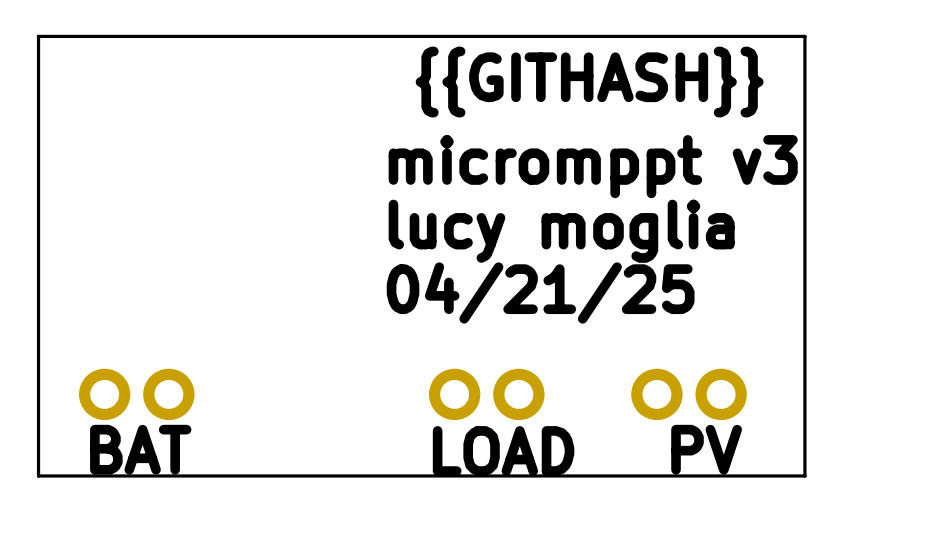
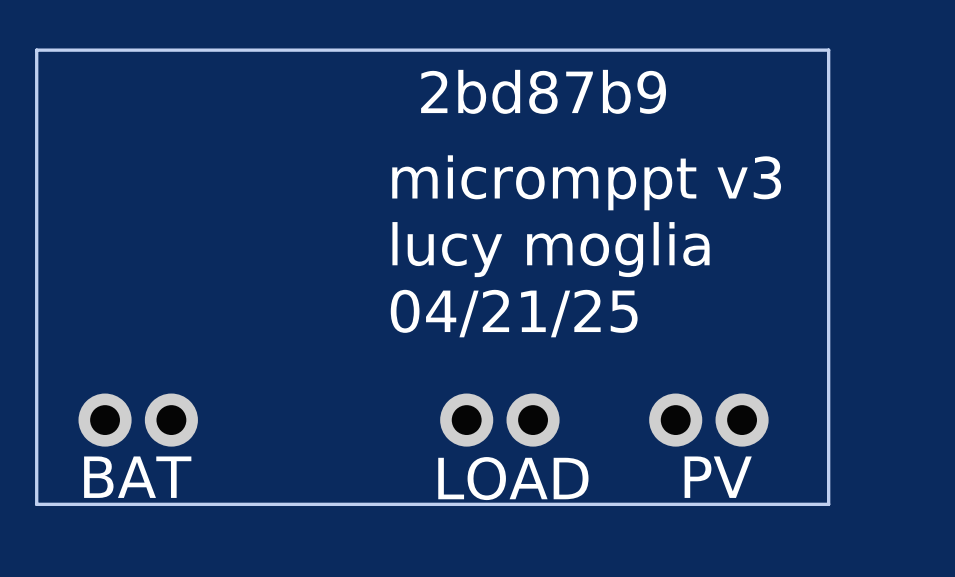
text: {{GITHASH}} (589, 82) -> 2bd87b9 (543, 91)

